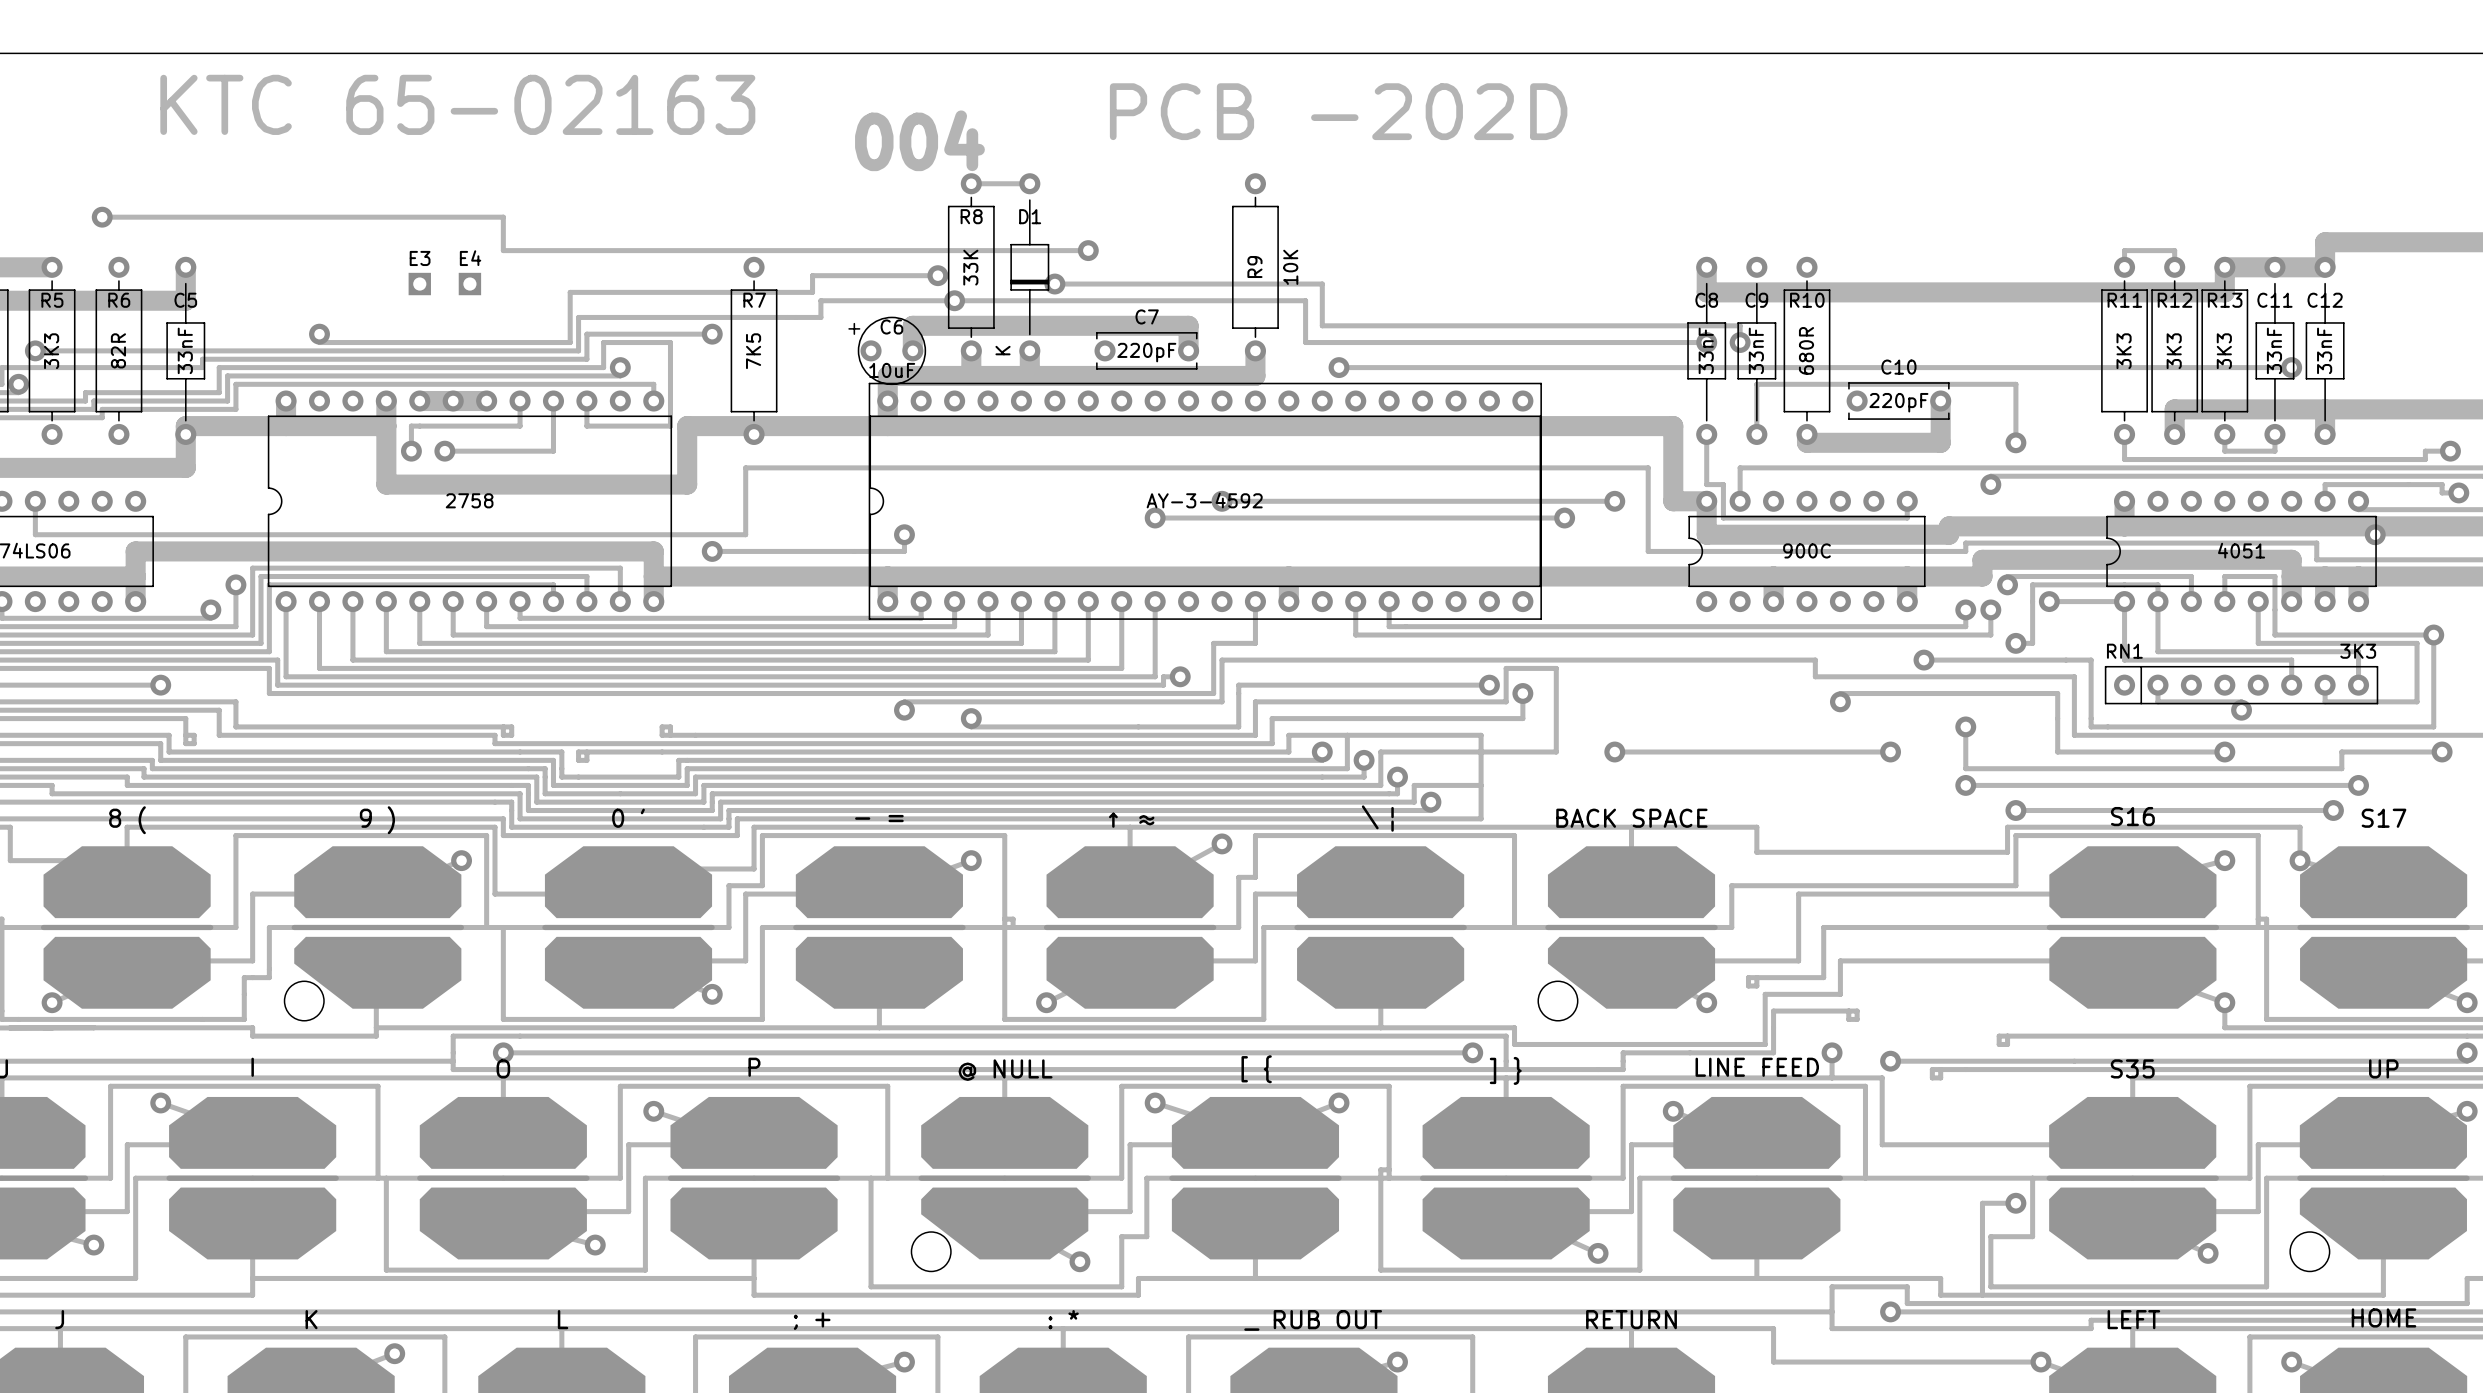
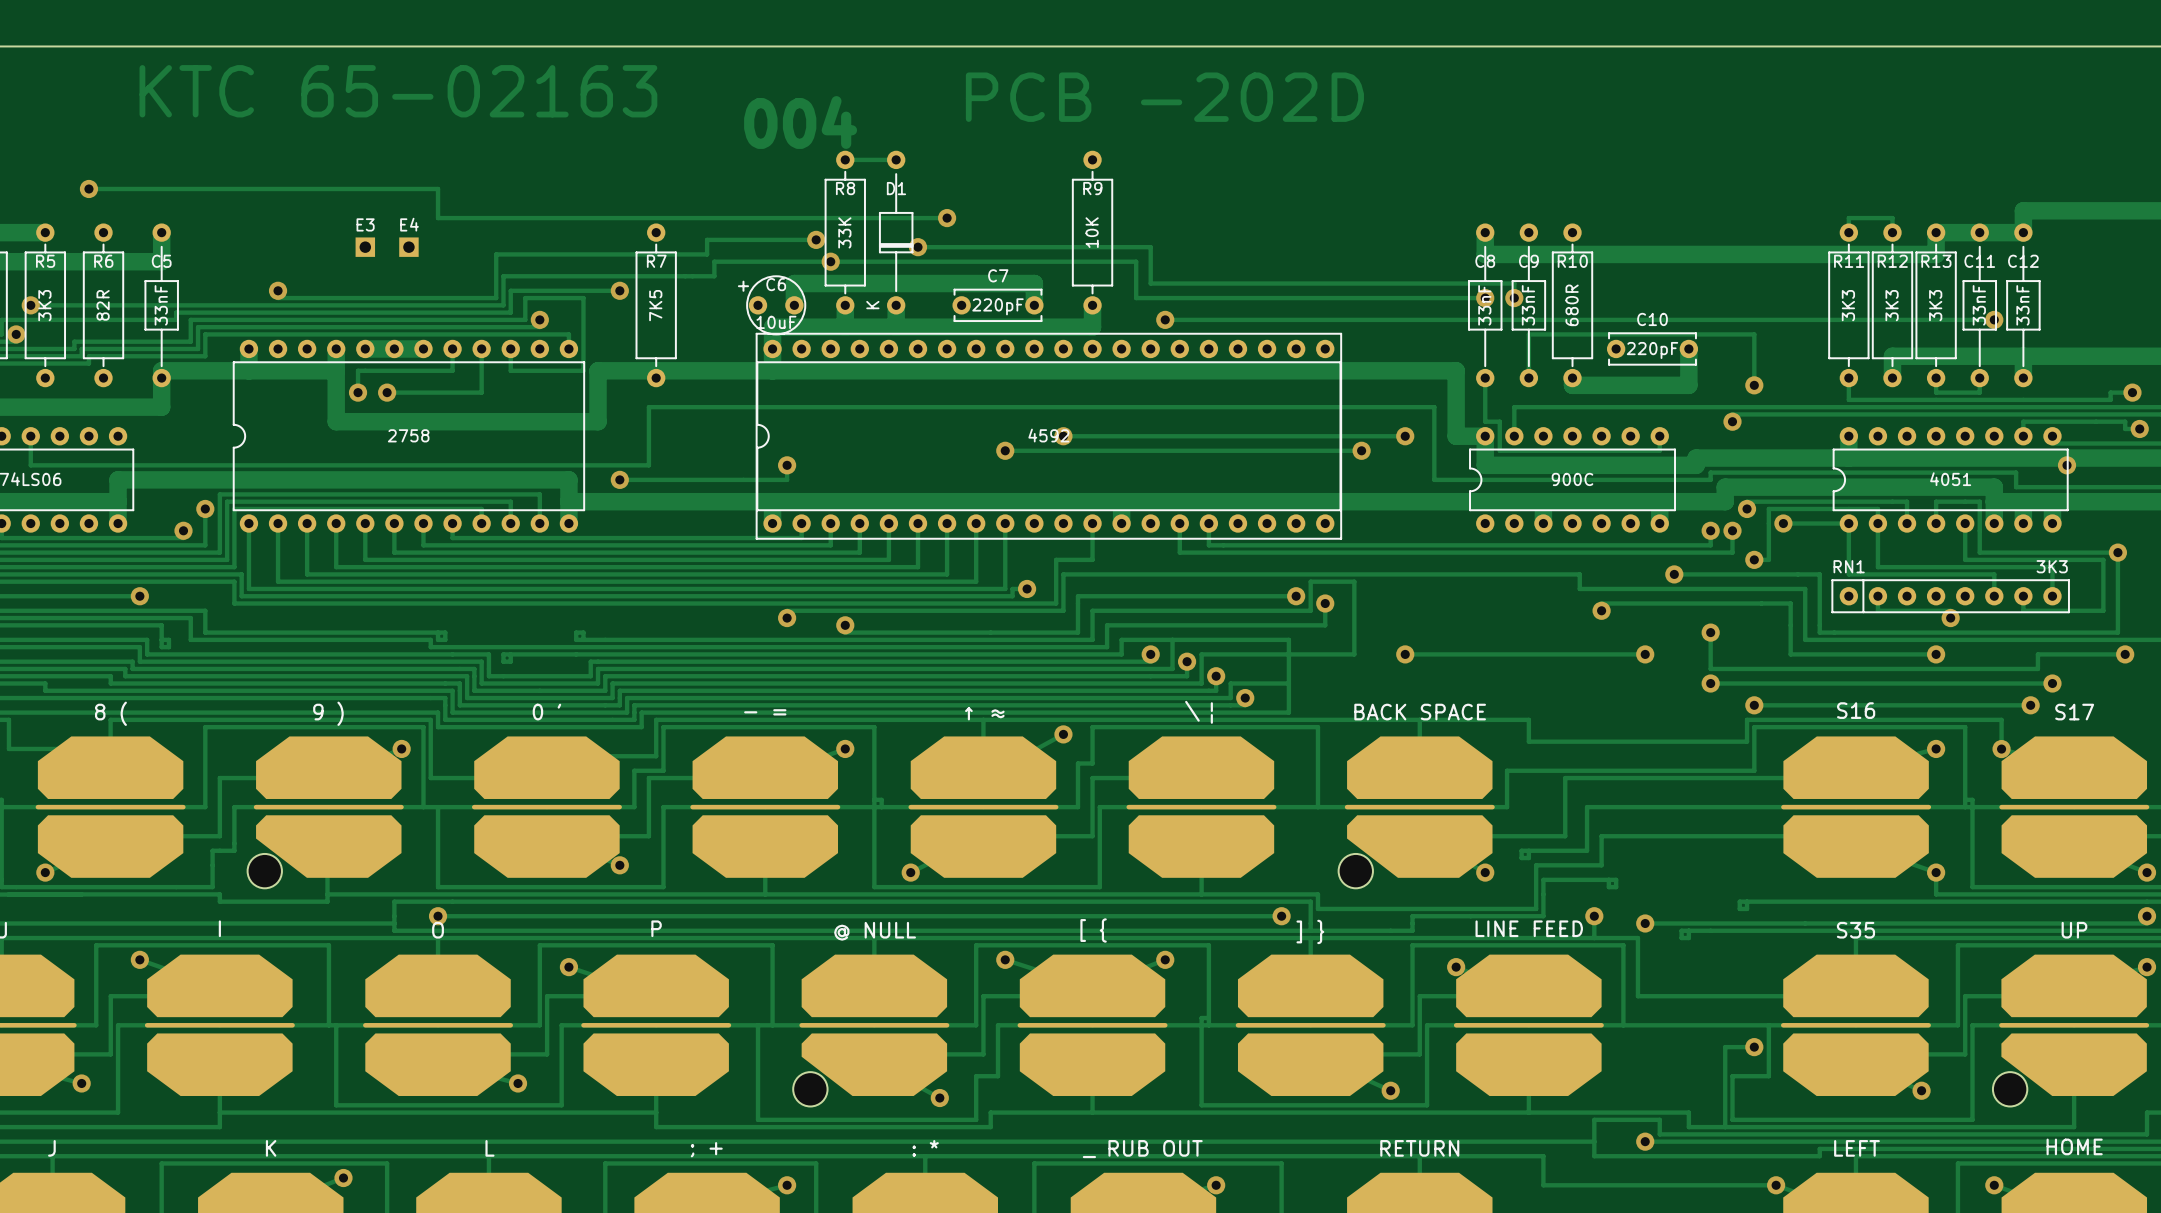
R9 name rotation: 0° (1254, 267) -> 90° clockwise (1092, 188)
R9 name position: R9 (1254, 267) -> R9 (1092, 188)
R9 value position: 10K (1290, 267) -> 10K (1092, 232)
part value: AY-3-4592 (1204, 500) -> 4592 (1048, 435)

